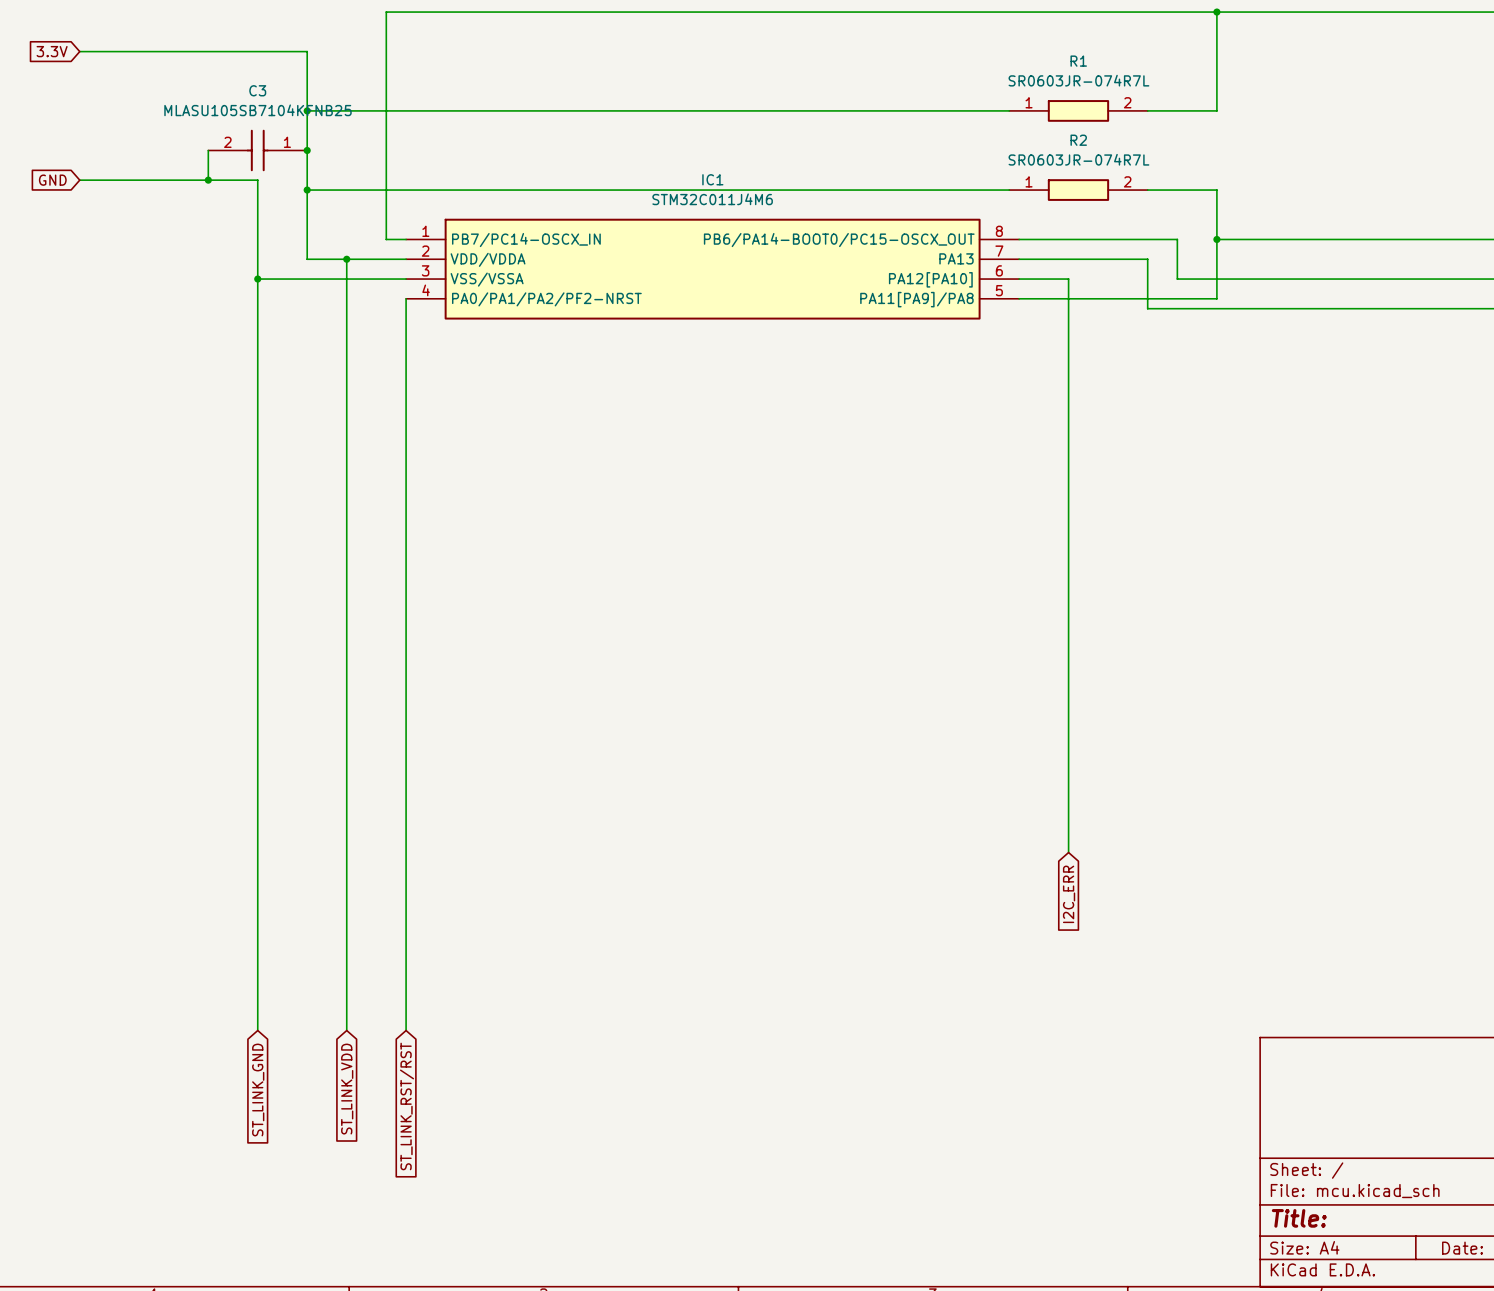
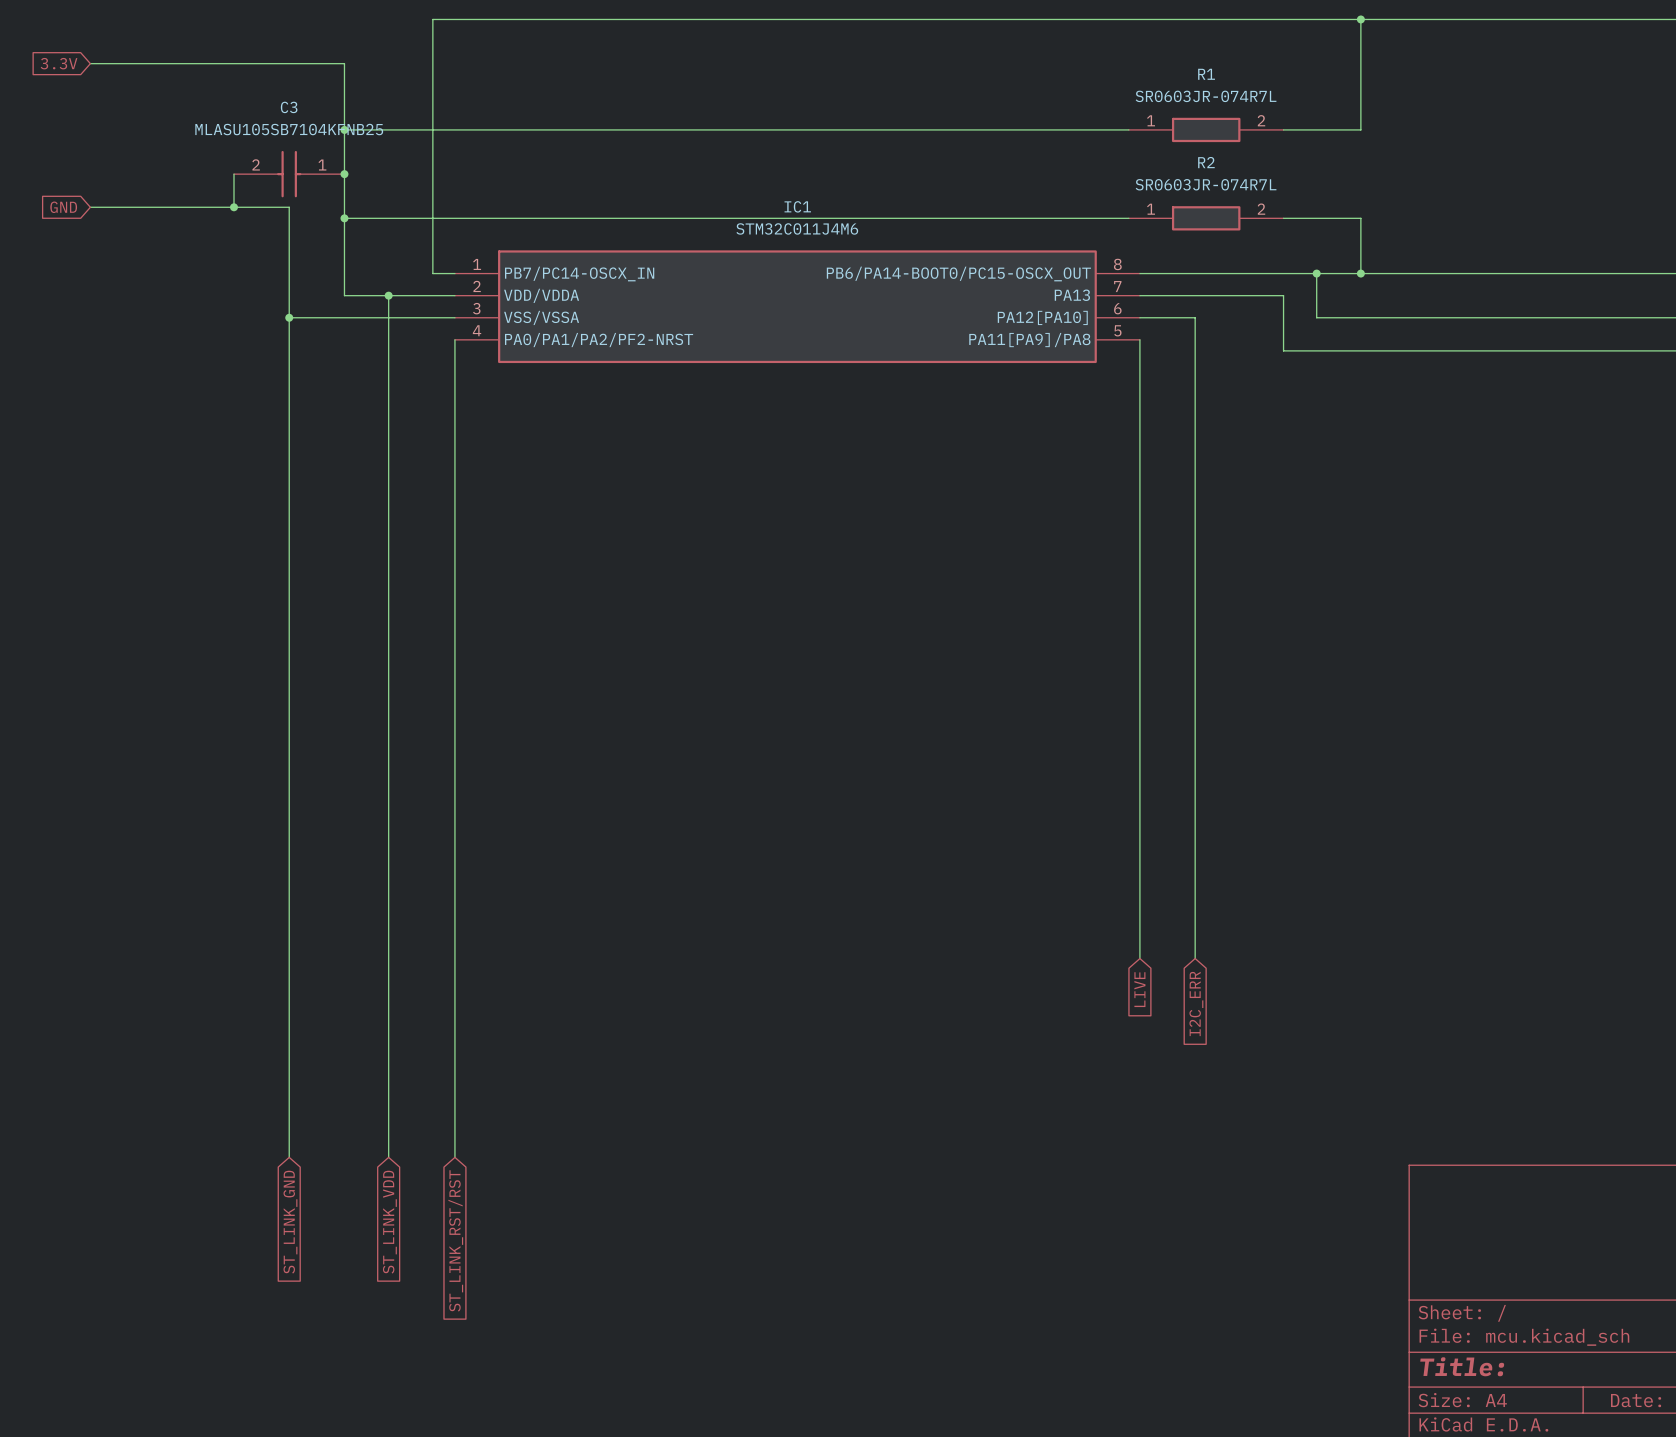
junction: none -> (1316, 273)
wire: (1216, 239) (1216, 298) (1019, 298) -> (1360, 273) (1316, 273)
wire: none -> (1139, 339) (1139, 958)
global label: none -> LIVE (1139, 989)

